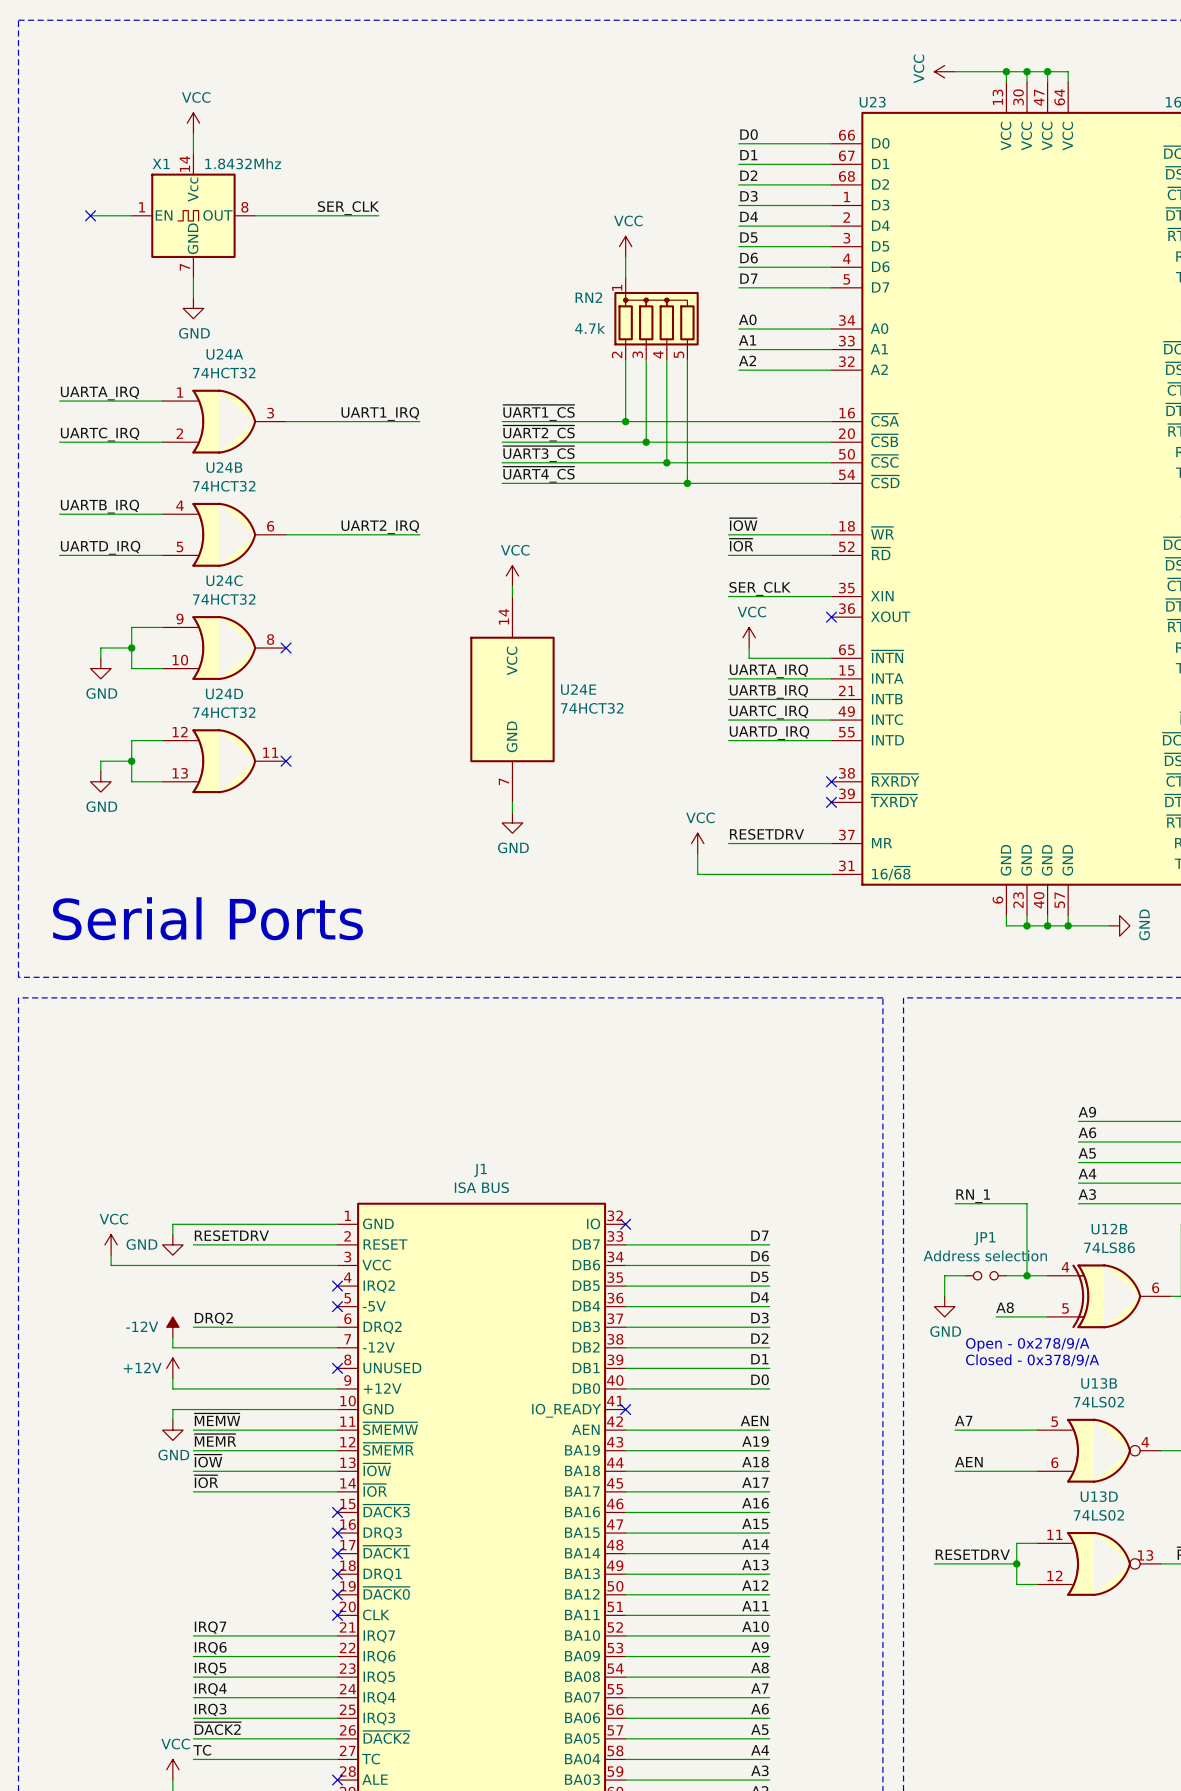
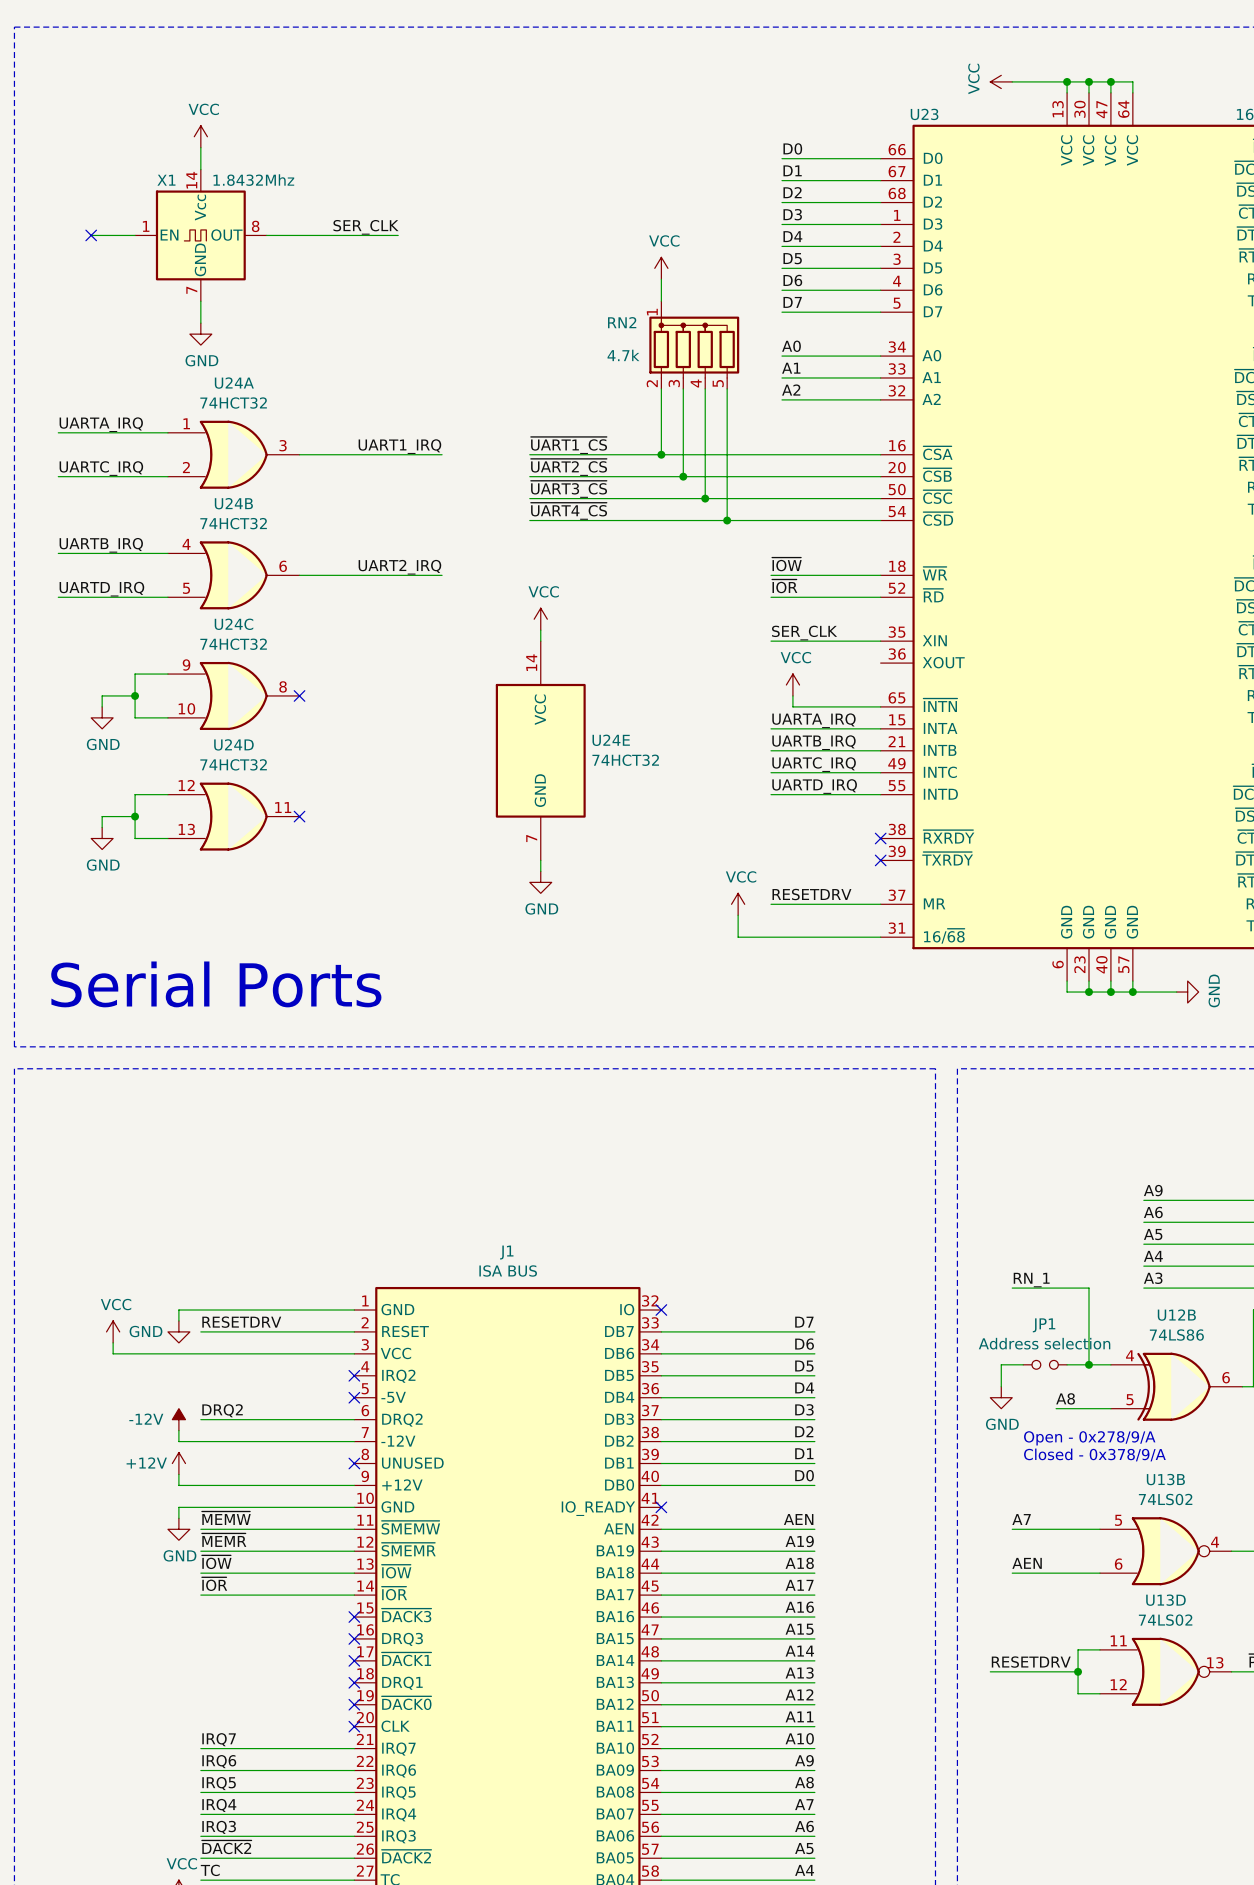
no-connect mark: (831, 617) -> none

